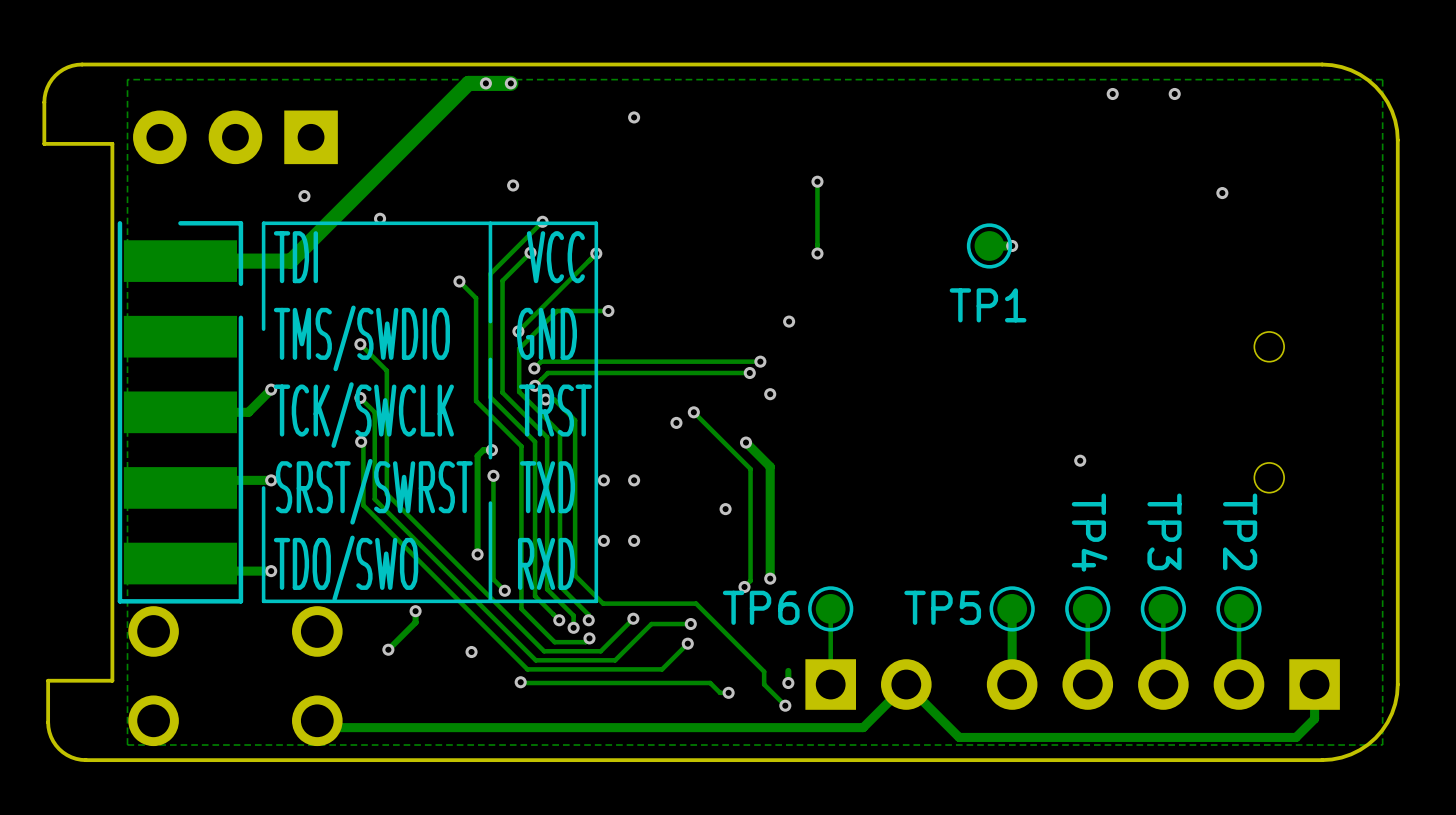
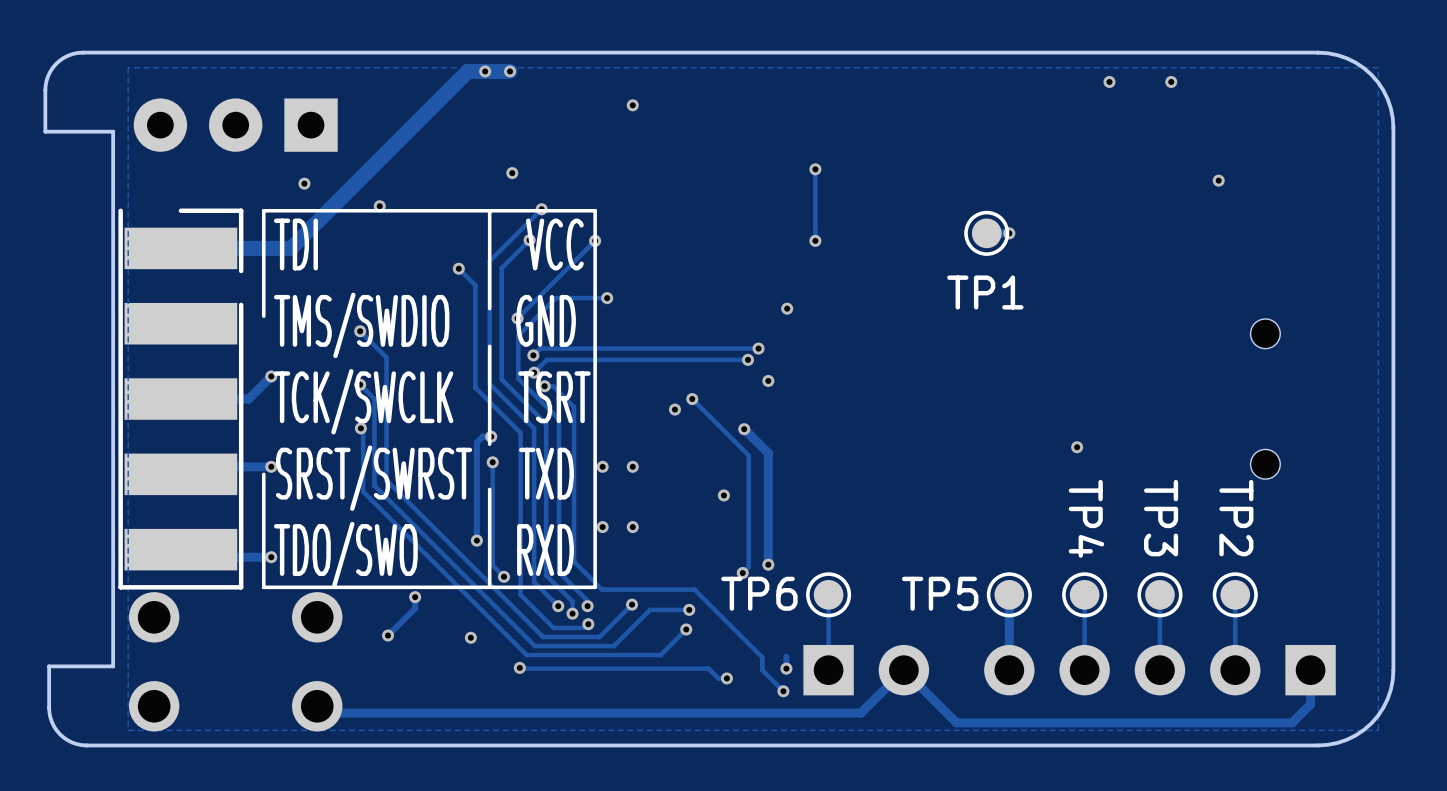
text: TCK/SWCLK TRST (432, 415) -> TCK/SWCLK TSRT (432, 401)

